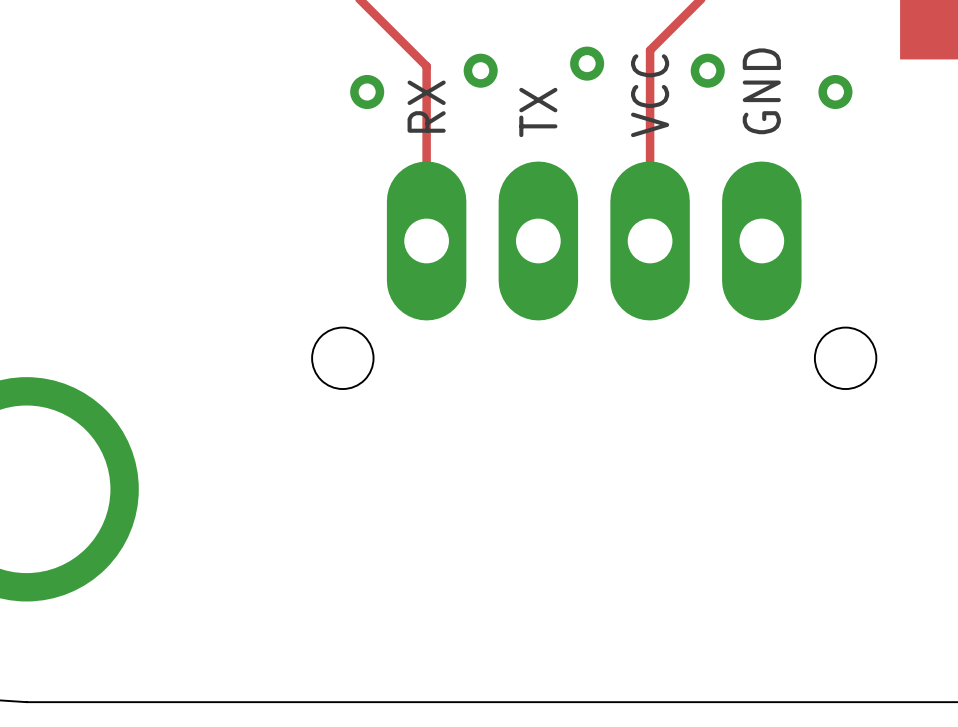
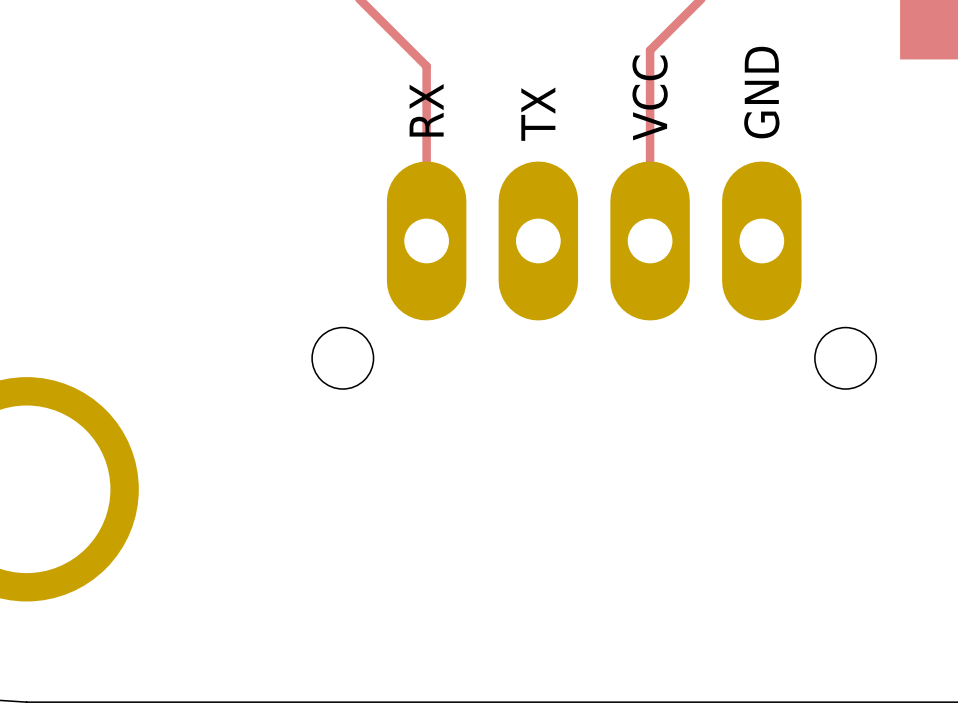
via: (587, 63) -> none
via: (480, 70) -> none
via: (707, 70) -> none
via: (367, 91) -> none
via: (835, 91) -> none

